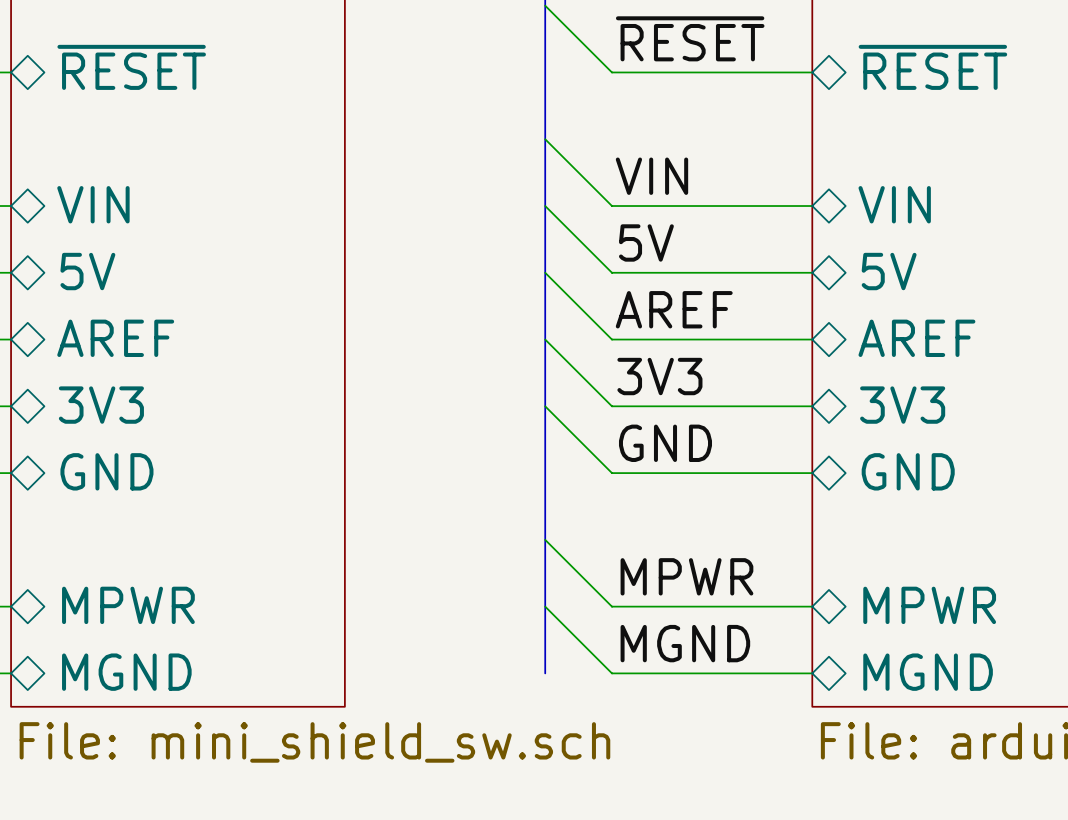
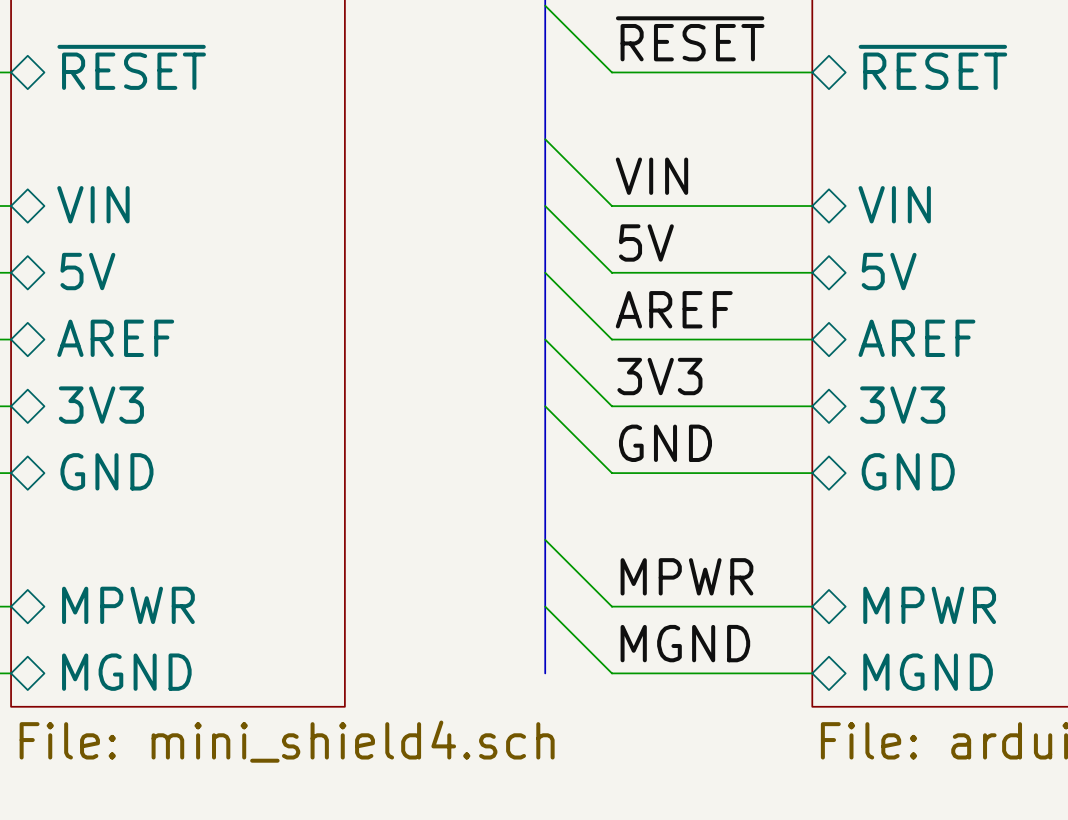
sheet value: File: mini_shield_sw.sch (314, 742) -> File: mini_shield4.sch (287, 741)

